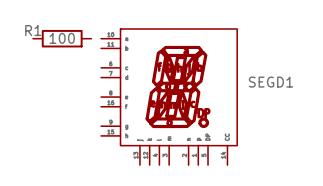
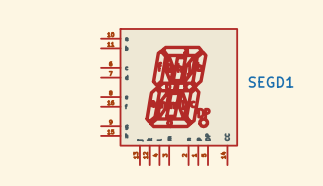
R1: 100 (62, 38) -> none

